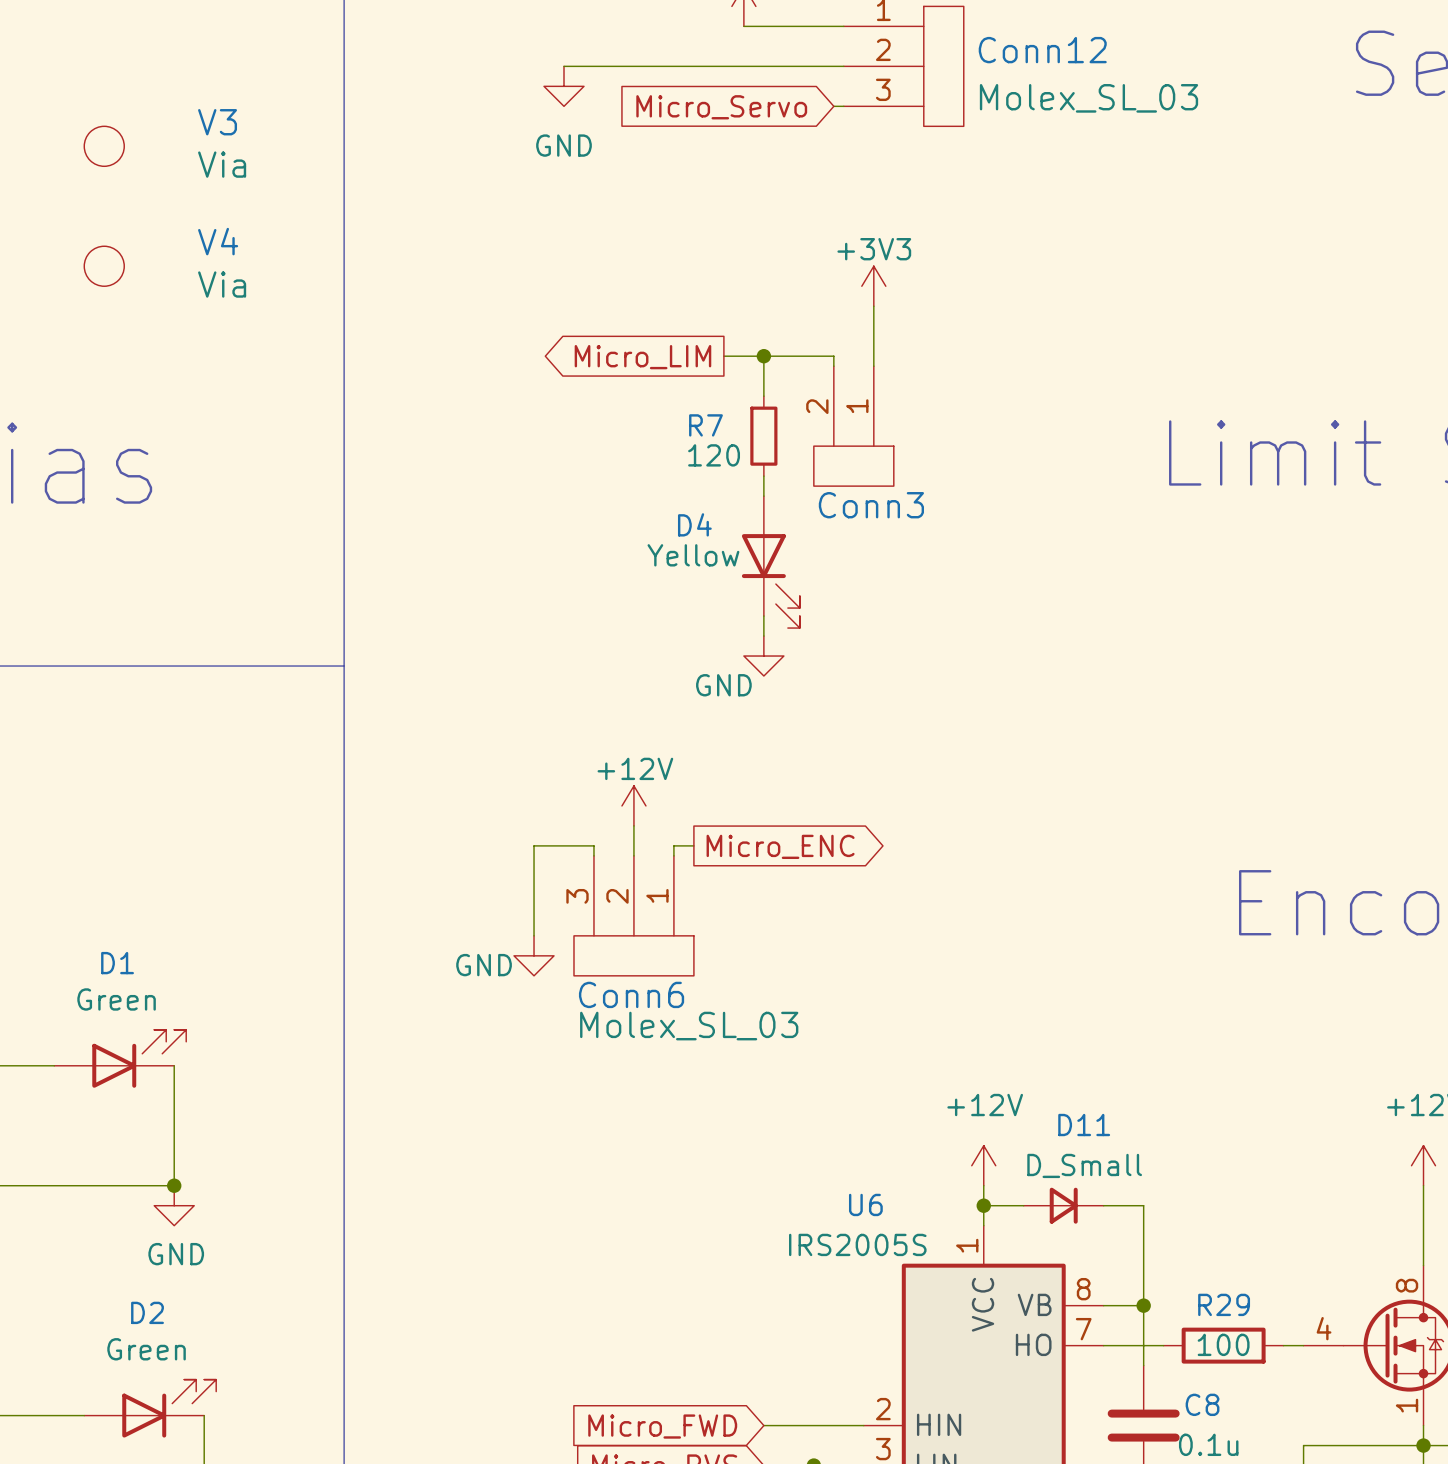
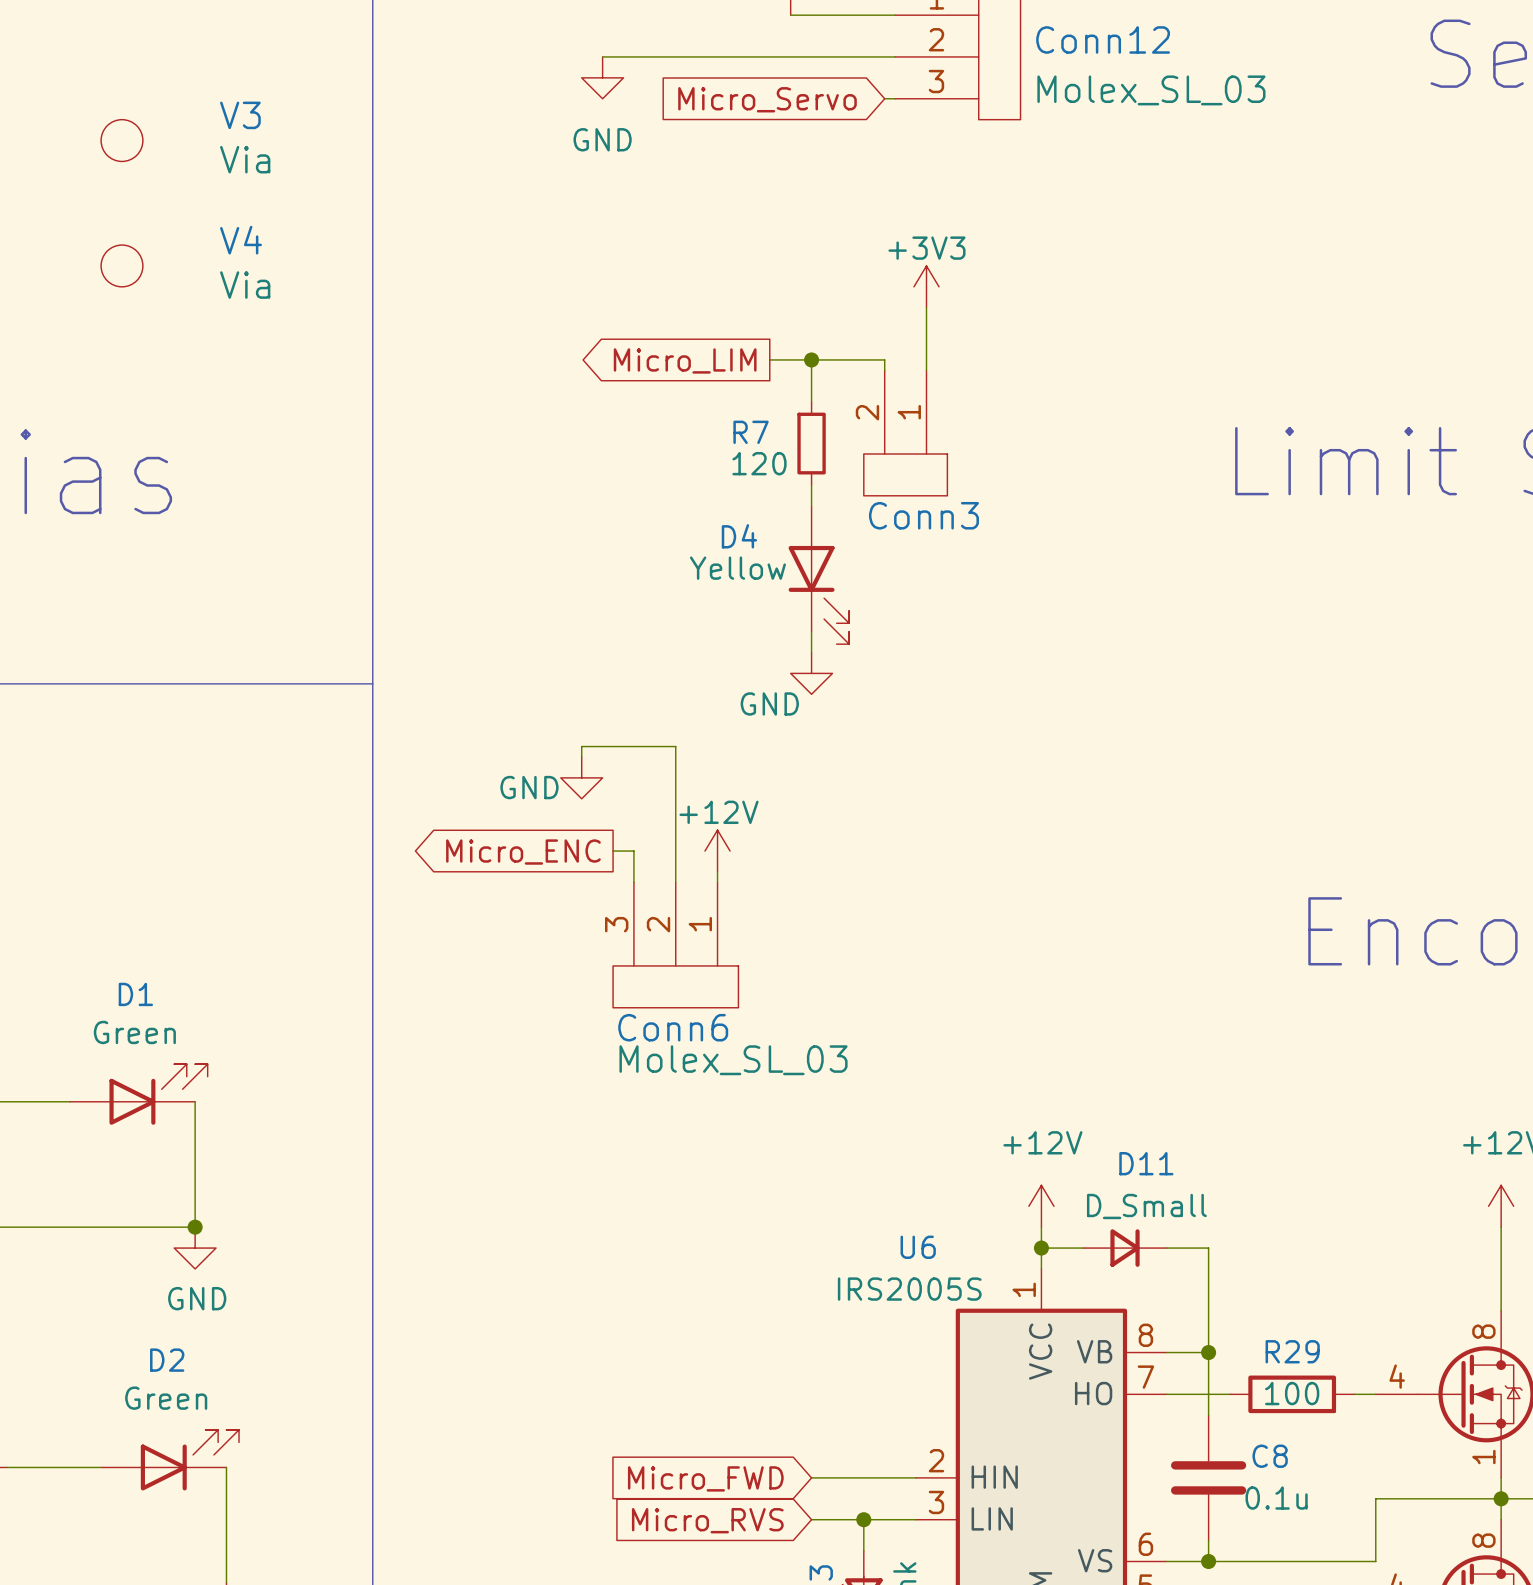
wire: none -> (581, 757) (581, 746) (675, 746) (675, 851)
power symbol position: +12V (633, 805) -> +12V (717, 851)
wire: (593, 845) (534, 845) (534, 935) -> (633, 871) (633, 851) (613, 851)
wire: (673, 845) (693, 845) -> none
global label rotation: 0° (780, 846) -> 180° (523, 852)
global label position: Micro_ENC (780, 846) -> Micro_ENC (523, 852)
power symbol position: GND (534, 955) -> GND (581, 777)

